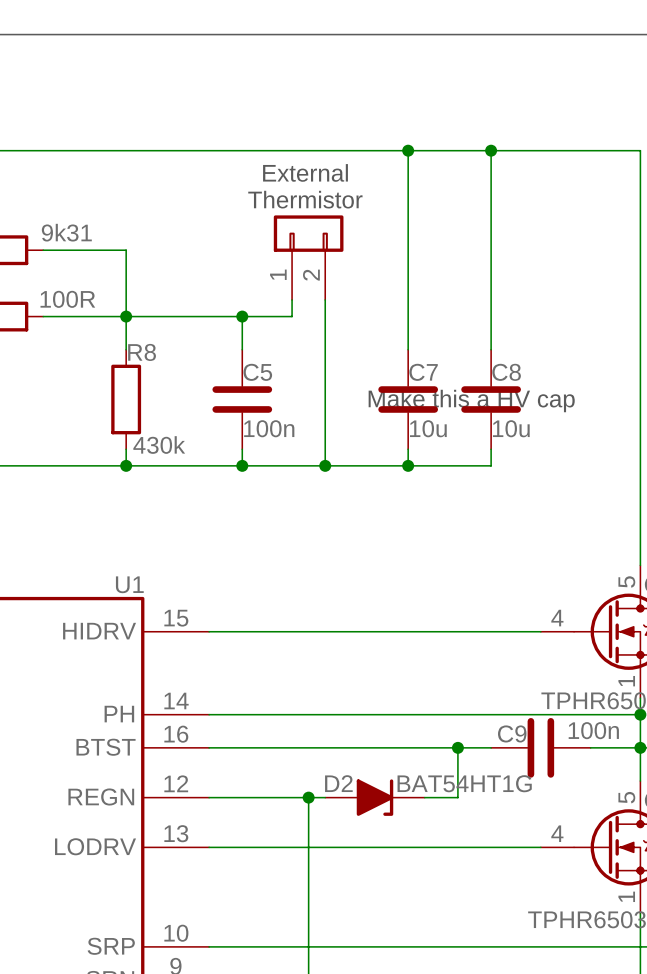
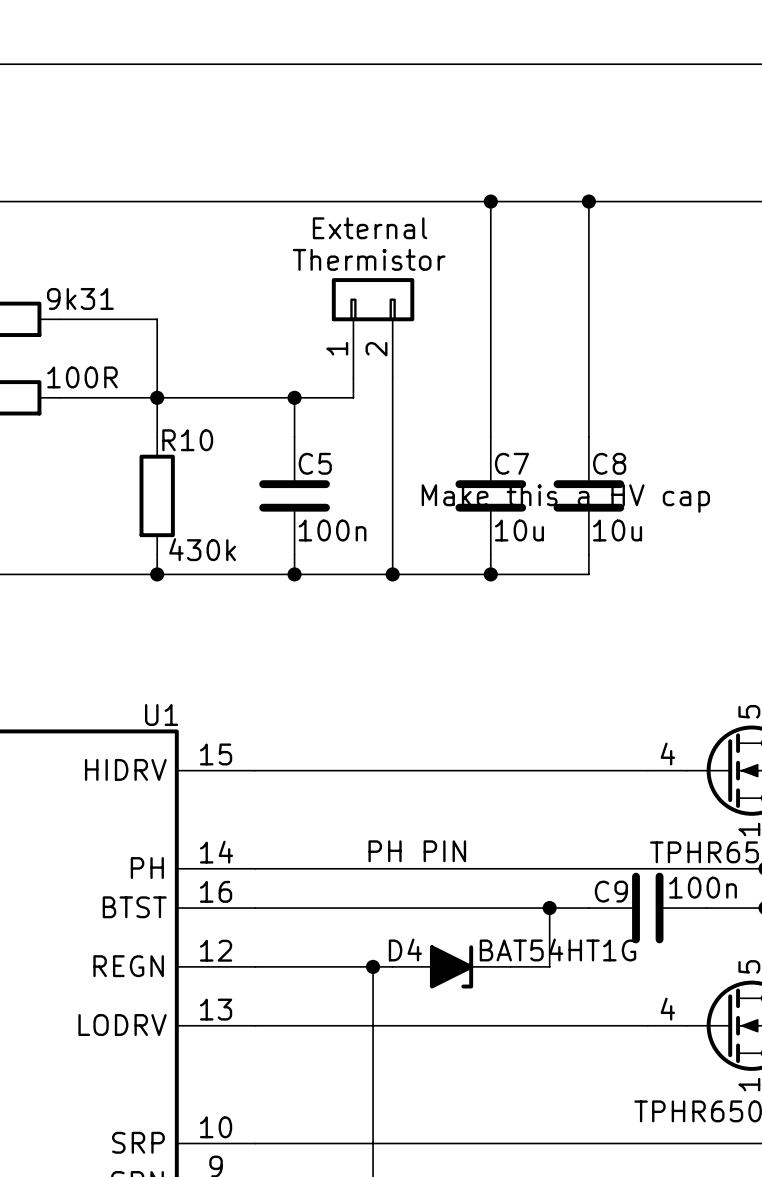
R8 name: R8 (142, 352) -> R10 (187, 440)
label: none -> PH PIN (417, 851)
D2 name: D2 (338, 783) -> D4 (405, 950)

